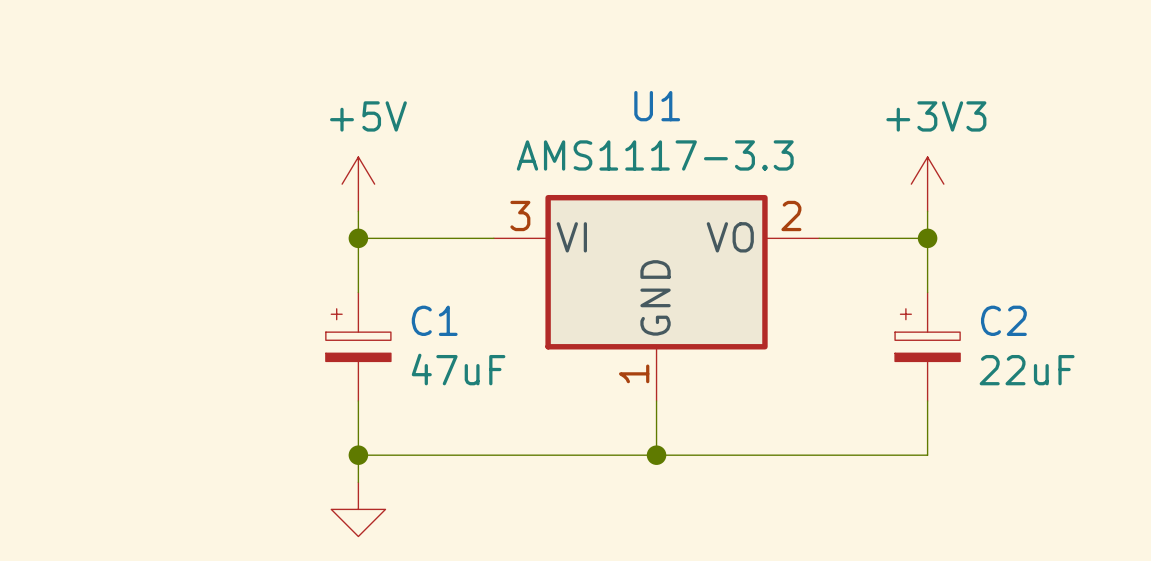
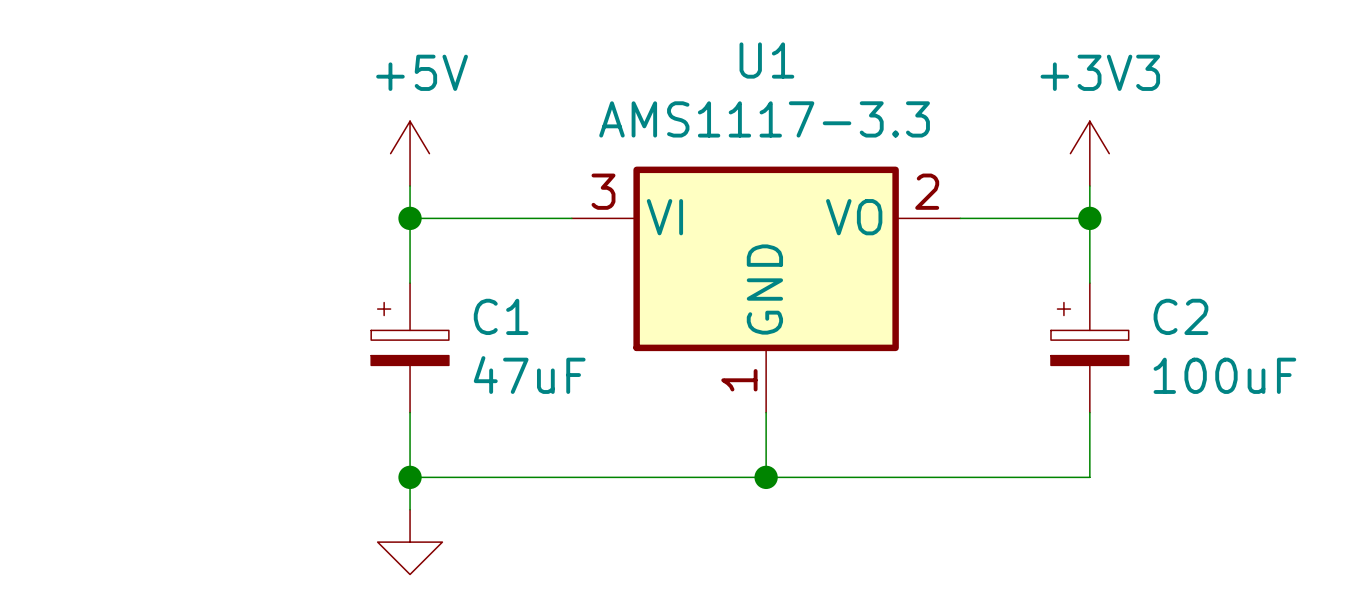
C2 value: 22uF (1027, 370) -> 100uF (1224, 375)

